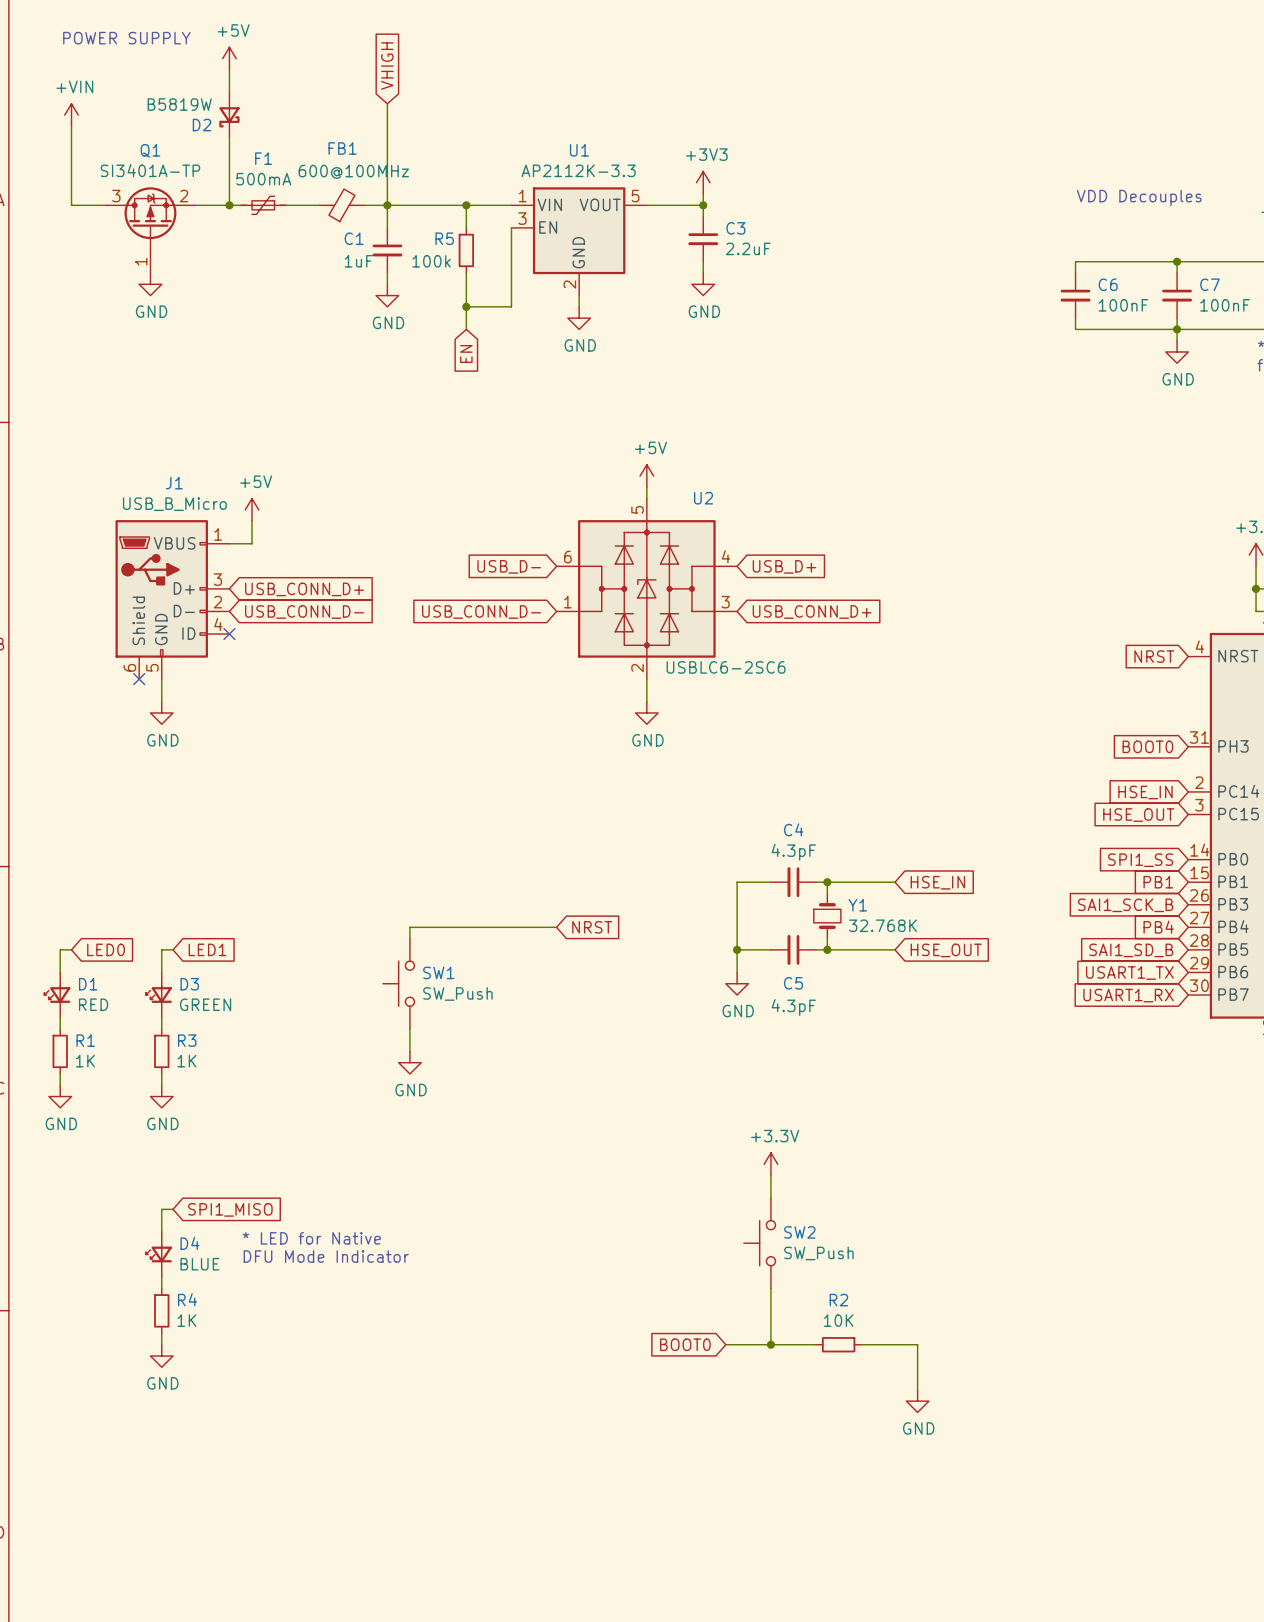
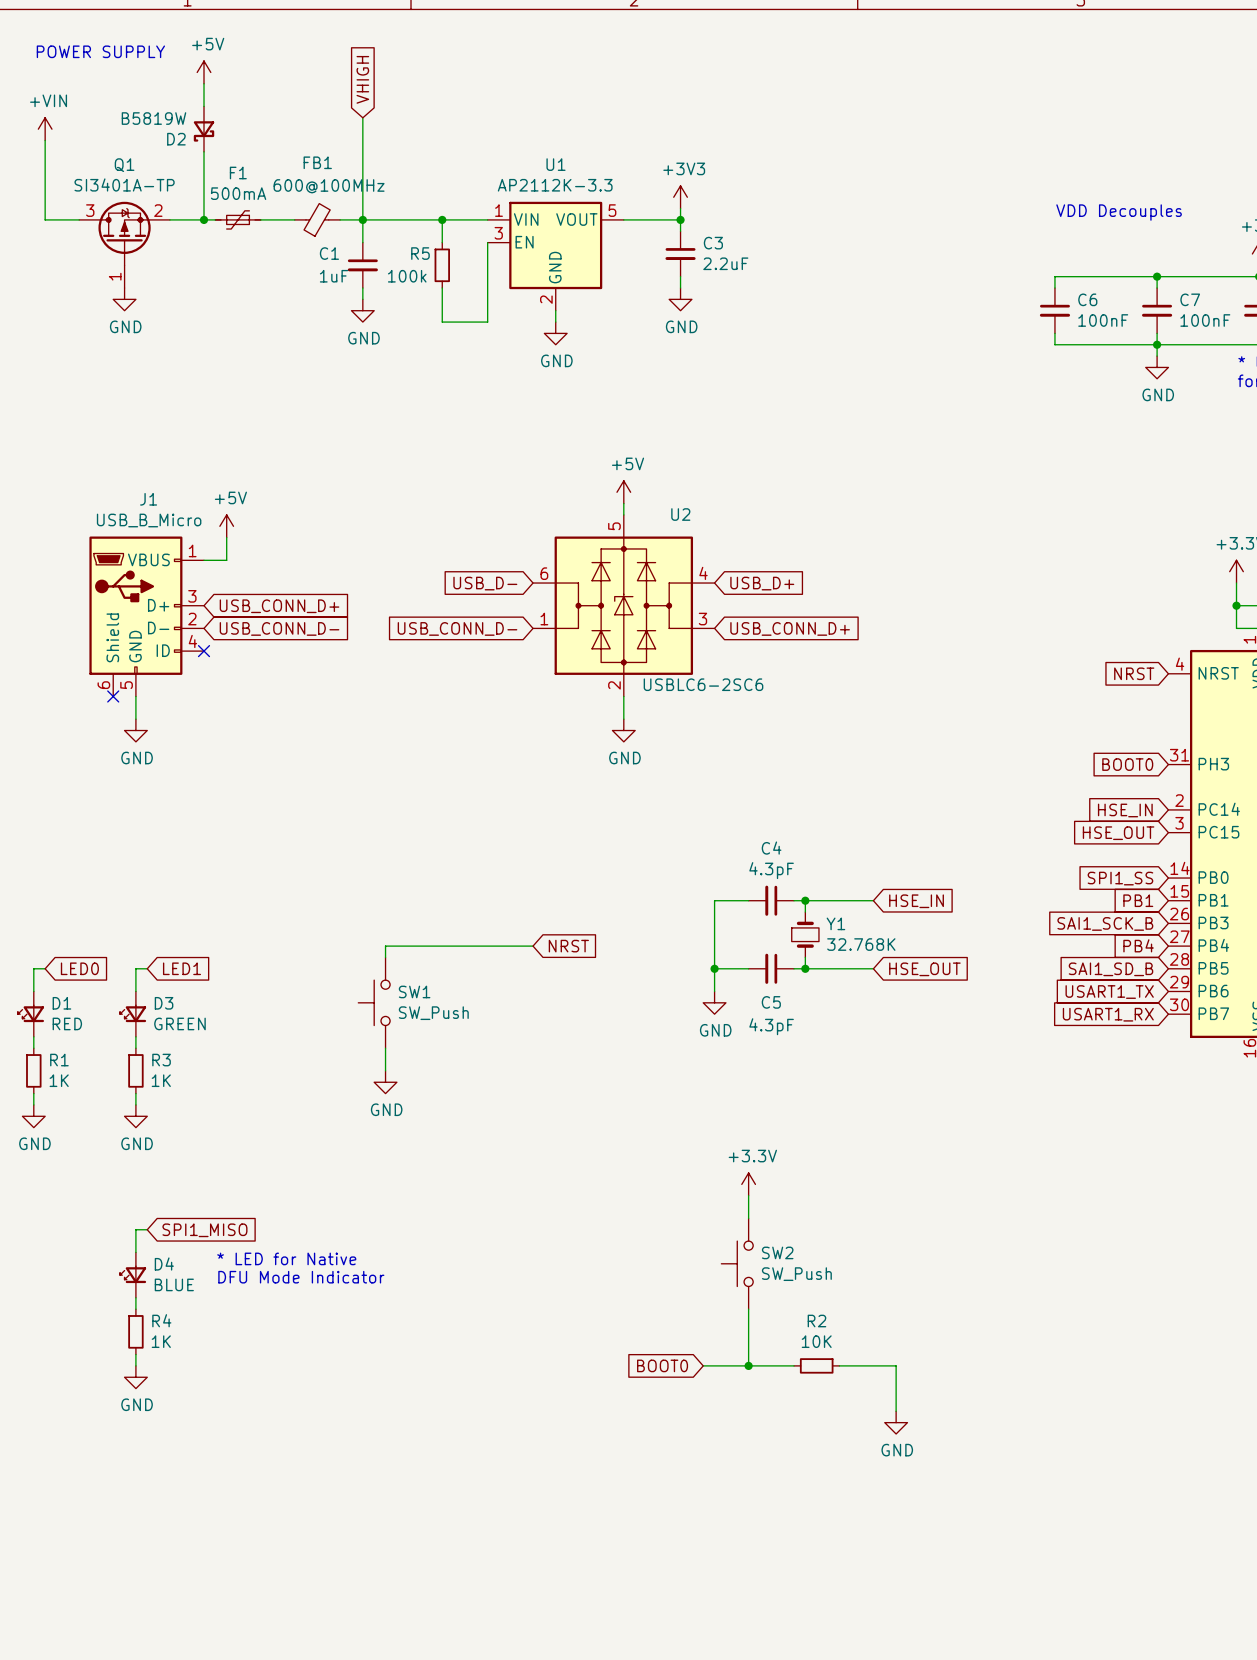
wire: (466, 306) (466, 329) -> none
junction: (466, 306) -> none
global label: EN (466, 354) -> none

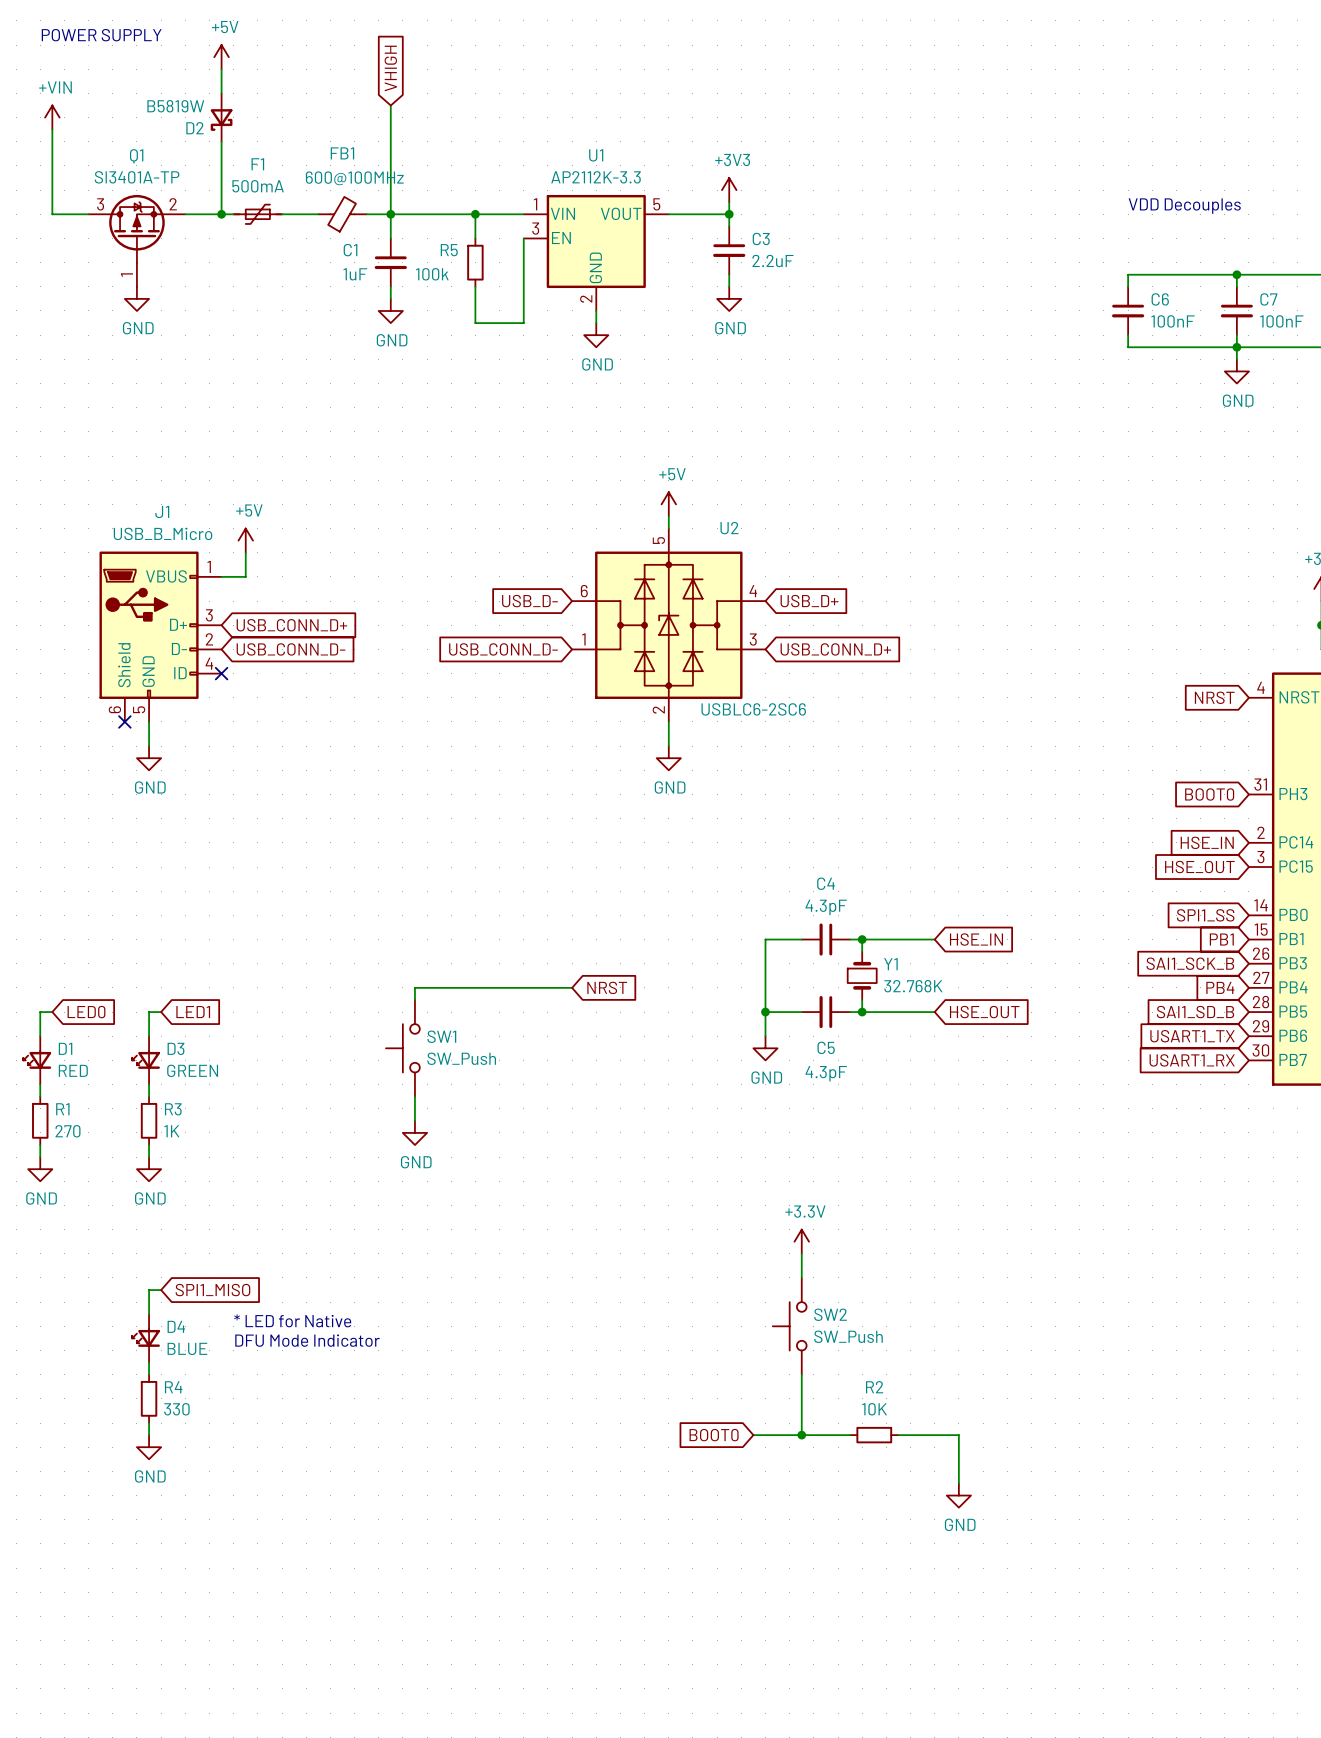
R1 value: 1K (59, 1080) -> 270 (67, 1131)
R4 value: 1K (161, 1341) -> 330 (176, 1409)

